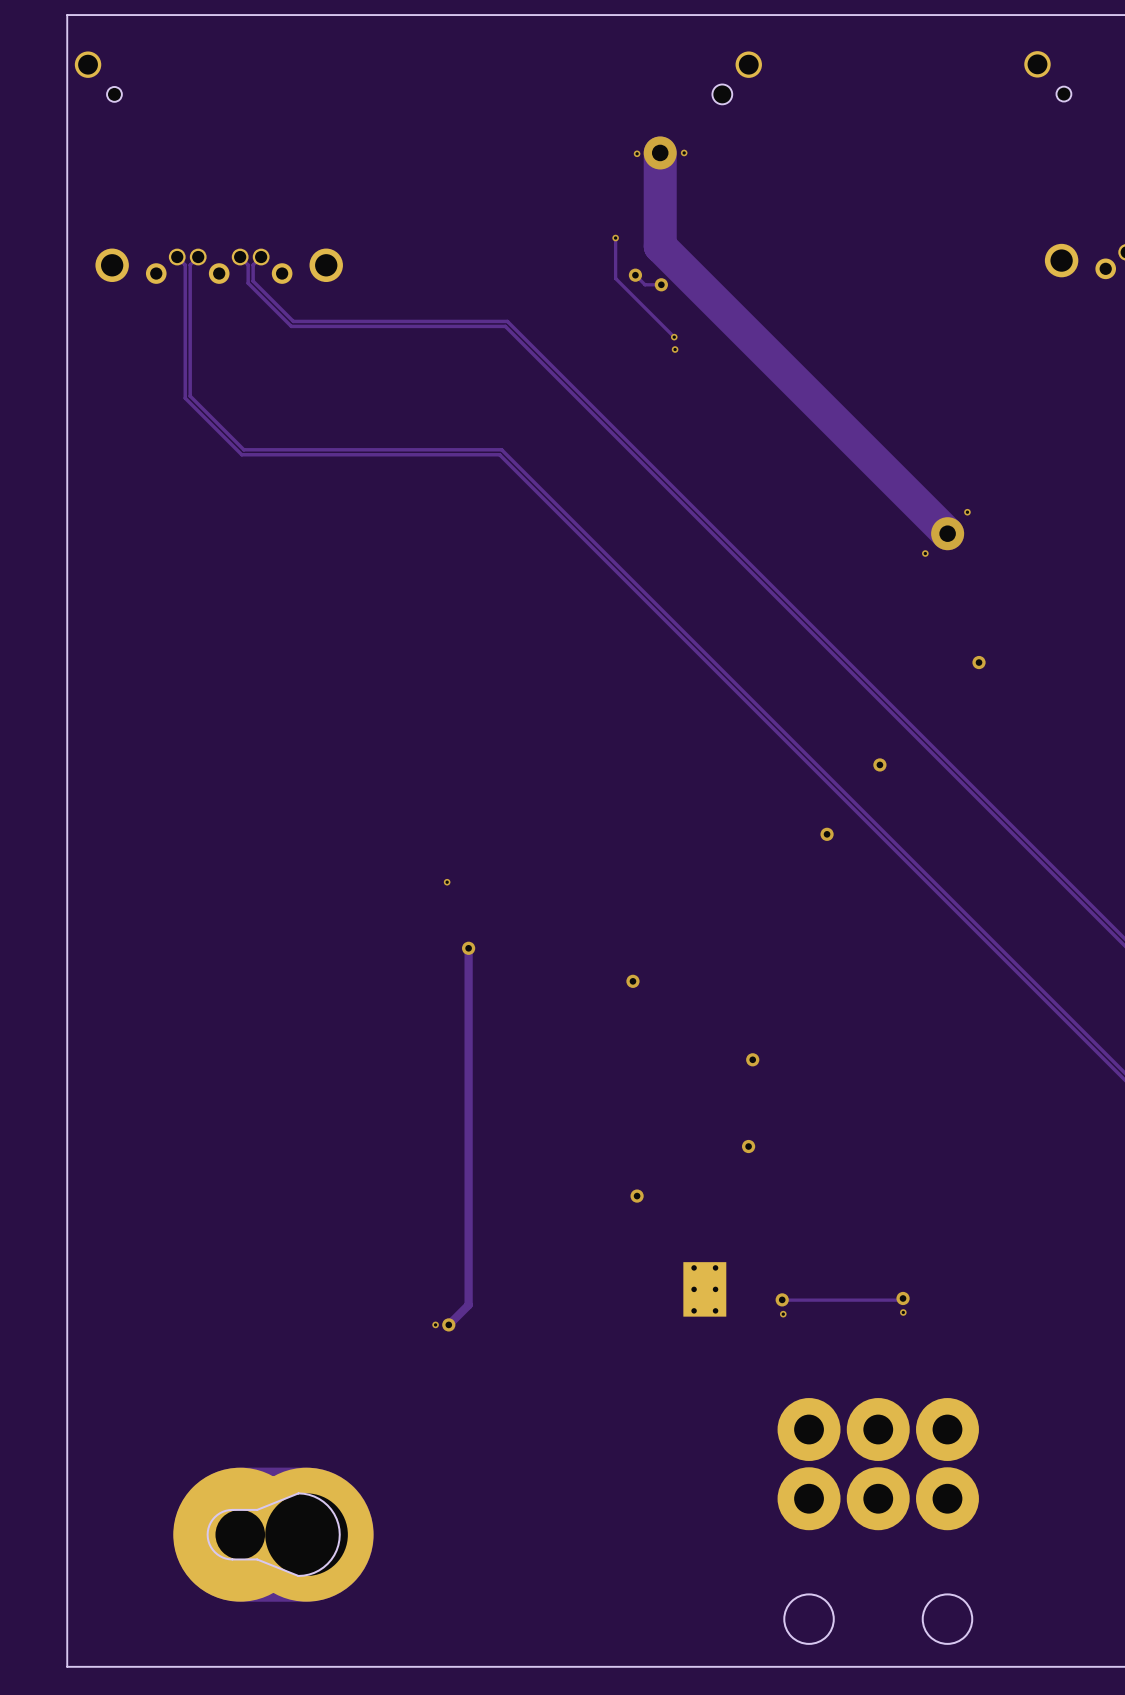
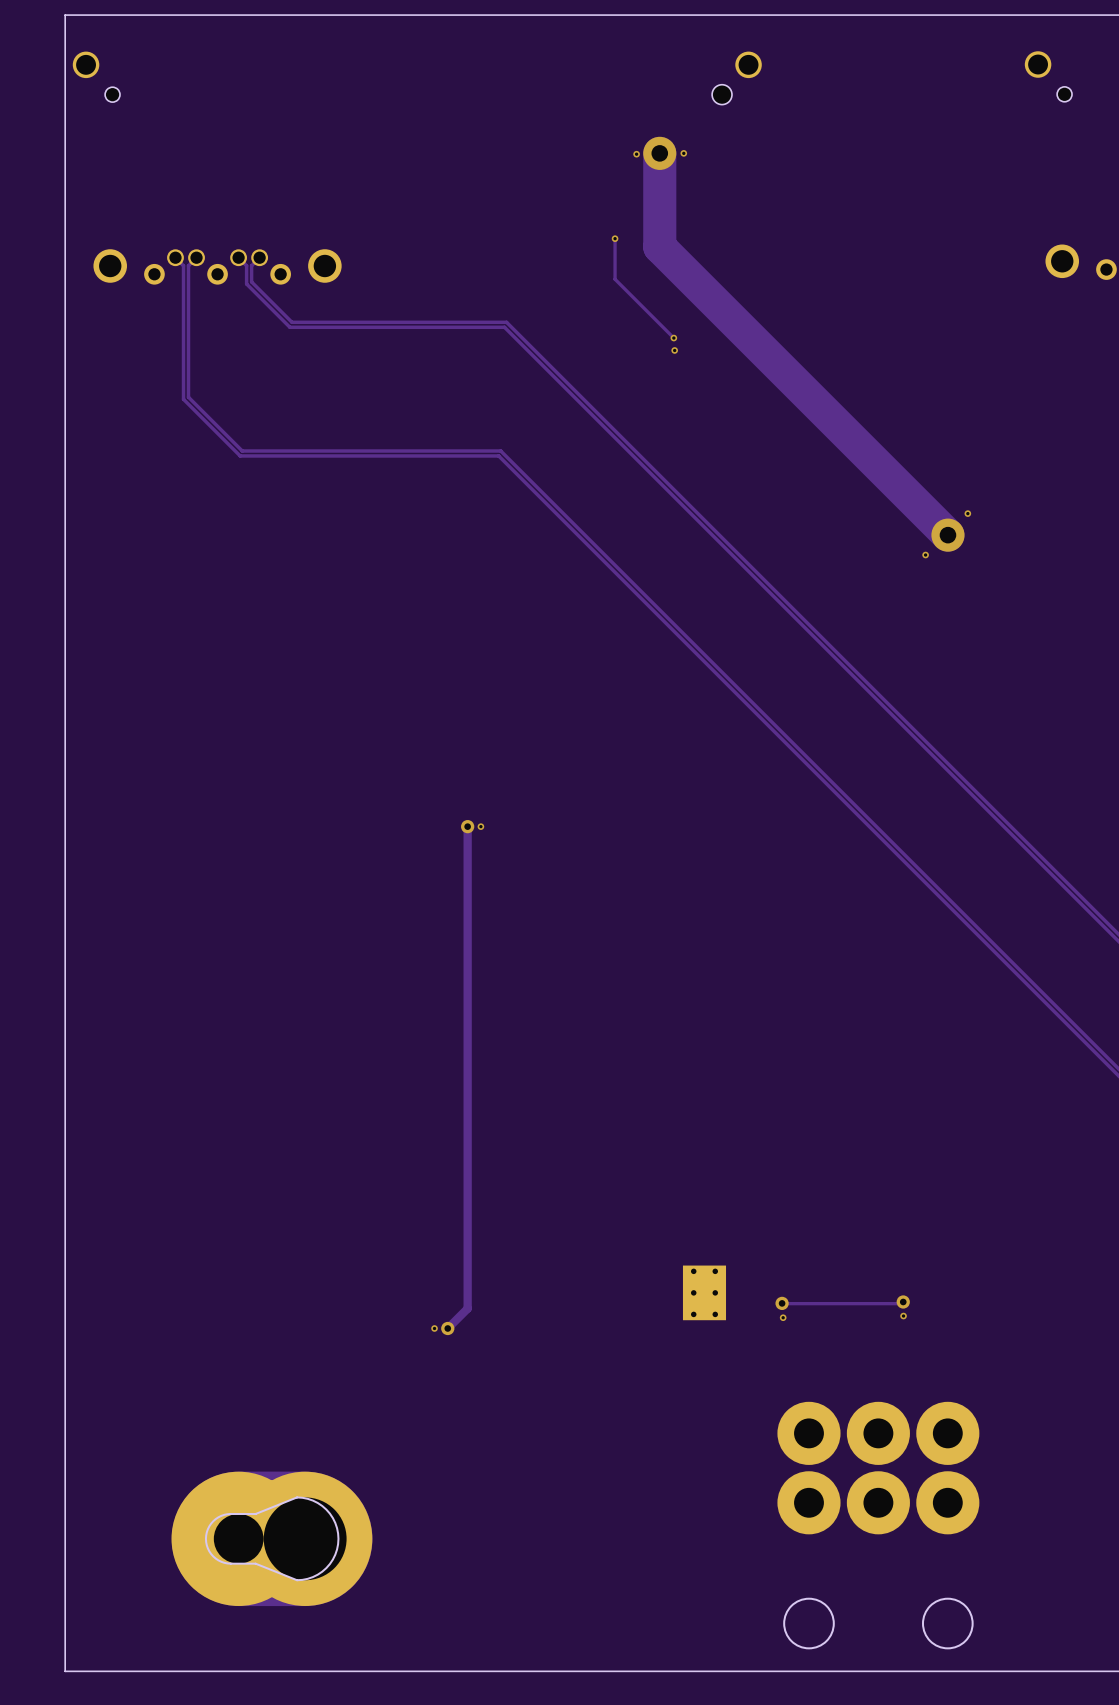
track: (635, 275) (645, 284) (661, 284) -> none
via: (635, 275) -> none
via: (661, 284) -> none
via: (979, 662) -> none
via: (879, 764) -> none
track: none -> (467, 826) (467, 950)
via: none -> (467, 826)
via: (827, 834) -> none
via position: (447, 882) -> (480, 826)
via: (468, 948) -> none
via: (632, 981) -> none
via: (752, 1059) -> none
via: (748, 1146) -> none
via: (637, 1196) -> none

